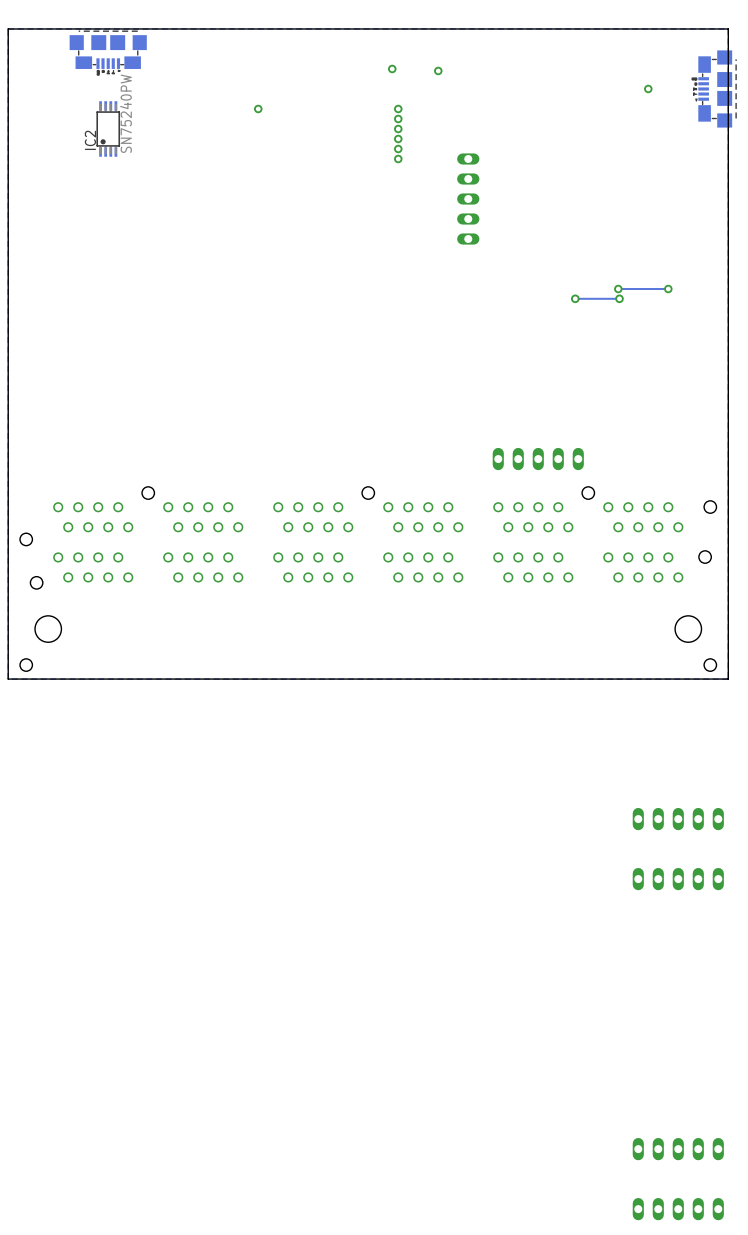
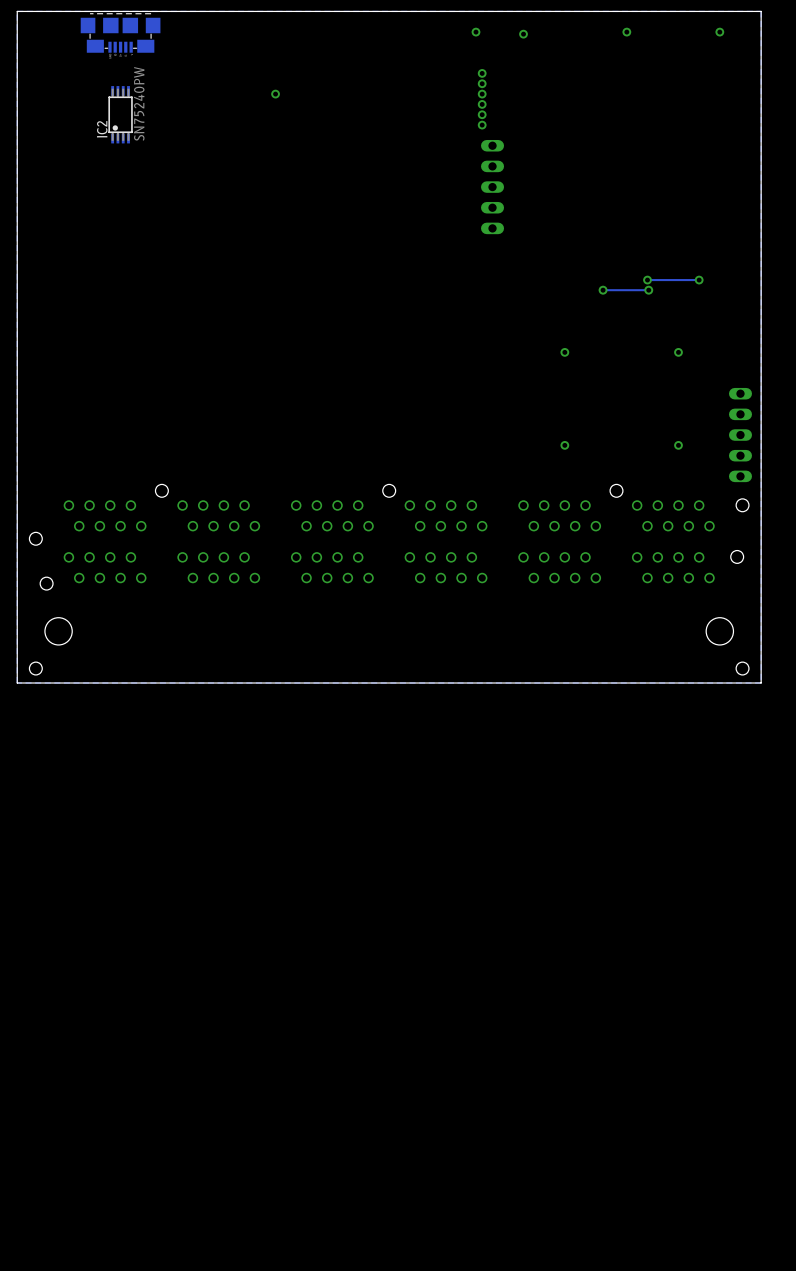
via: none -> (475, 32)
via: none -> (626, 32)
via: none -> (719, 32)
via: none -> (523, 34)
via: (392, 68) -> none
via: (438, 70) -> none
via: none -> (482, 73)
via: (648, 88) -> none
part: (717, 88) -> none
via: none -> (482, 83)
via: (398, 108) -> none
via: none -> (482, 94)
via: (398, 118) -> none
via: none -> (482, 104)
via: (398, 128) -> none
via: none -> (482, 114)
via: (398, 138) -> none
via: none -> (482, 125)
via: (398, 148) -> none
via: (398, 158) -> none
via: none -> (564, 352)
via: none -> (678, 352)
via: none -> (564, 445)
via: none -> (678, 445)
part rotation: 0° (538, 459) -> 90° clockwise (740, 435)
part position: (538, 459) -> (740, 435)
part: (678, 819) -> none
part: (678, 879) -> none
part: (678, 1149) -> none
part: (678, 1209) -> none

